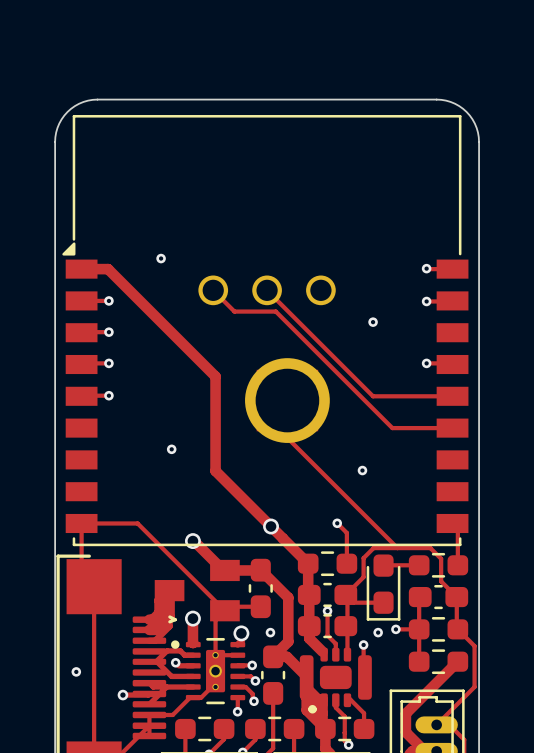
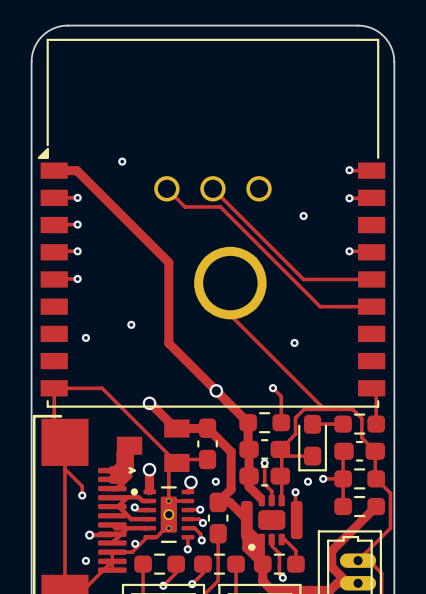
via: none -> (85, 337)
track: none -> (64, 468) (82, 486) (82, 495)
via: none -> (82, 495)
via: (76, 671) -> none
via: none -> (135, 543)
via: none -> (85, 560)

